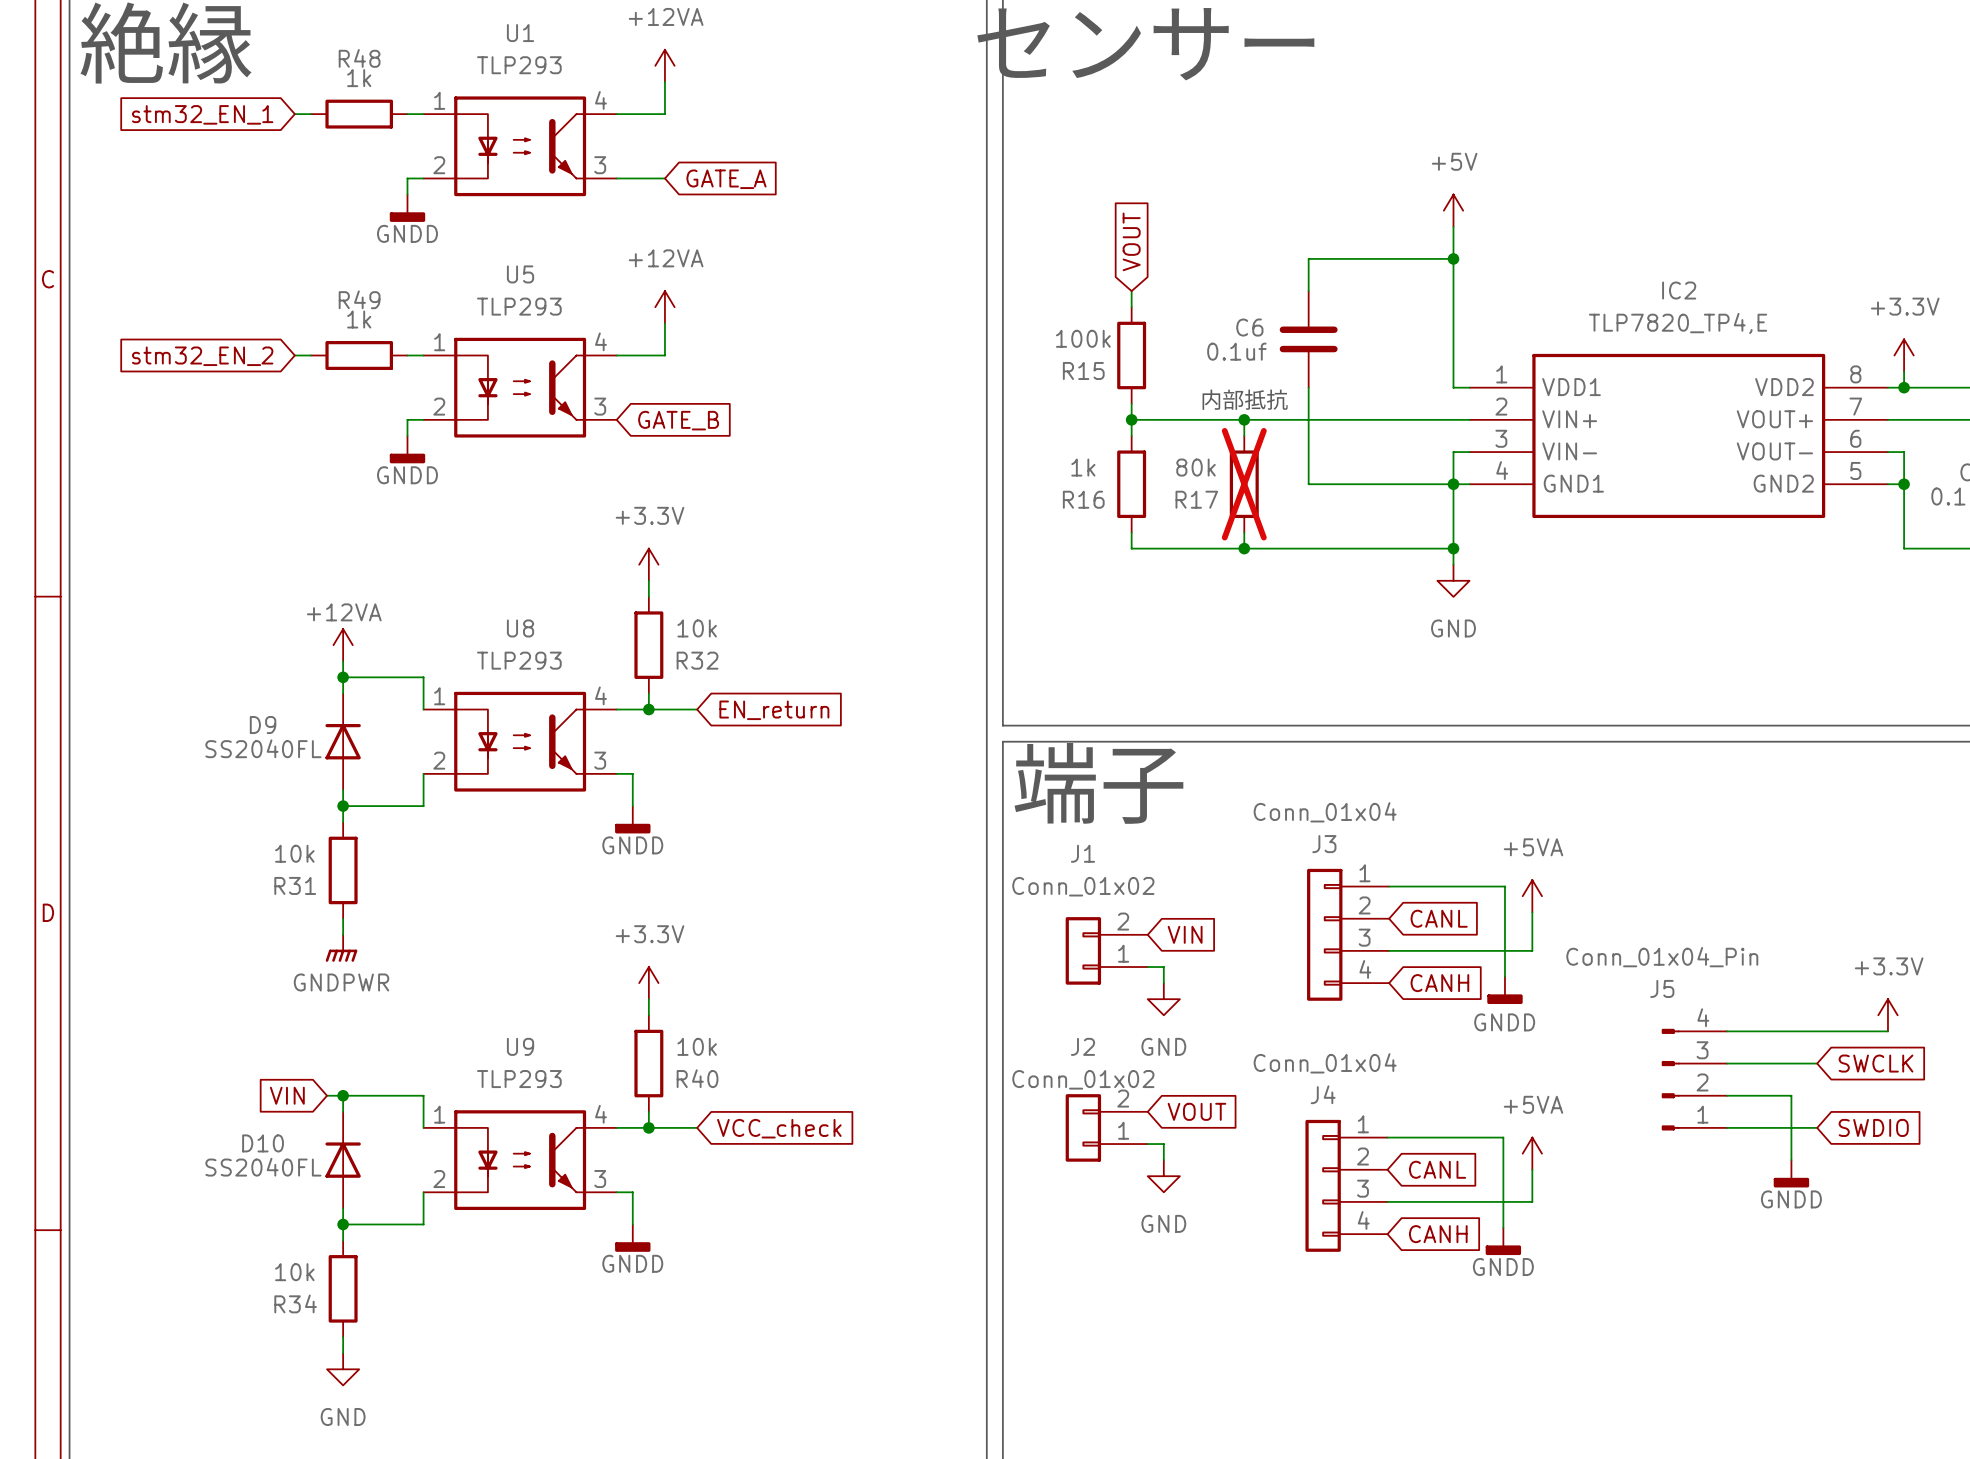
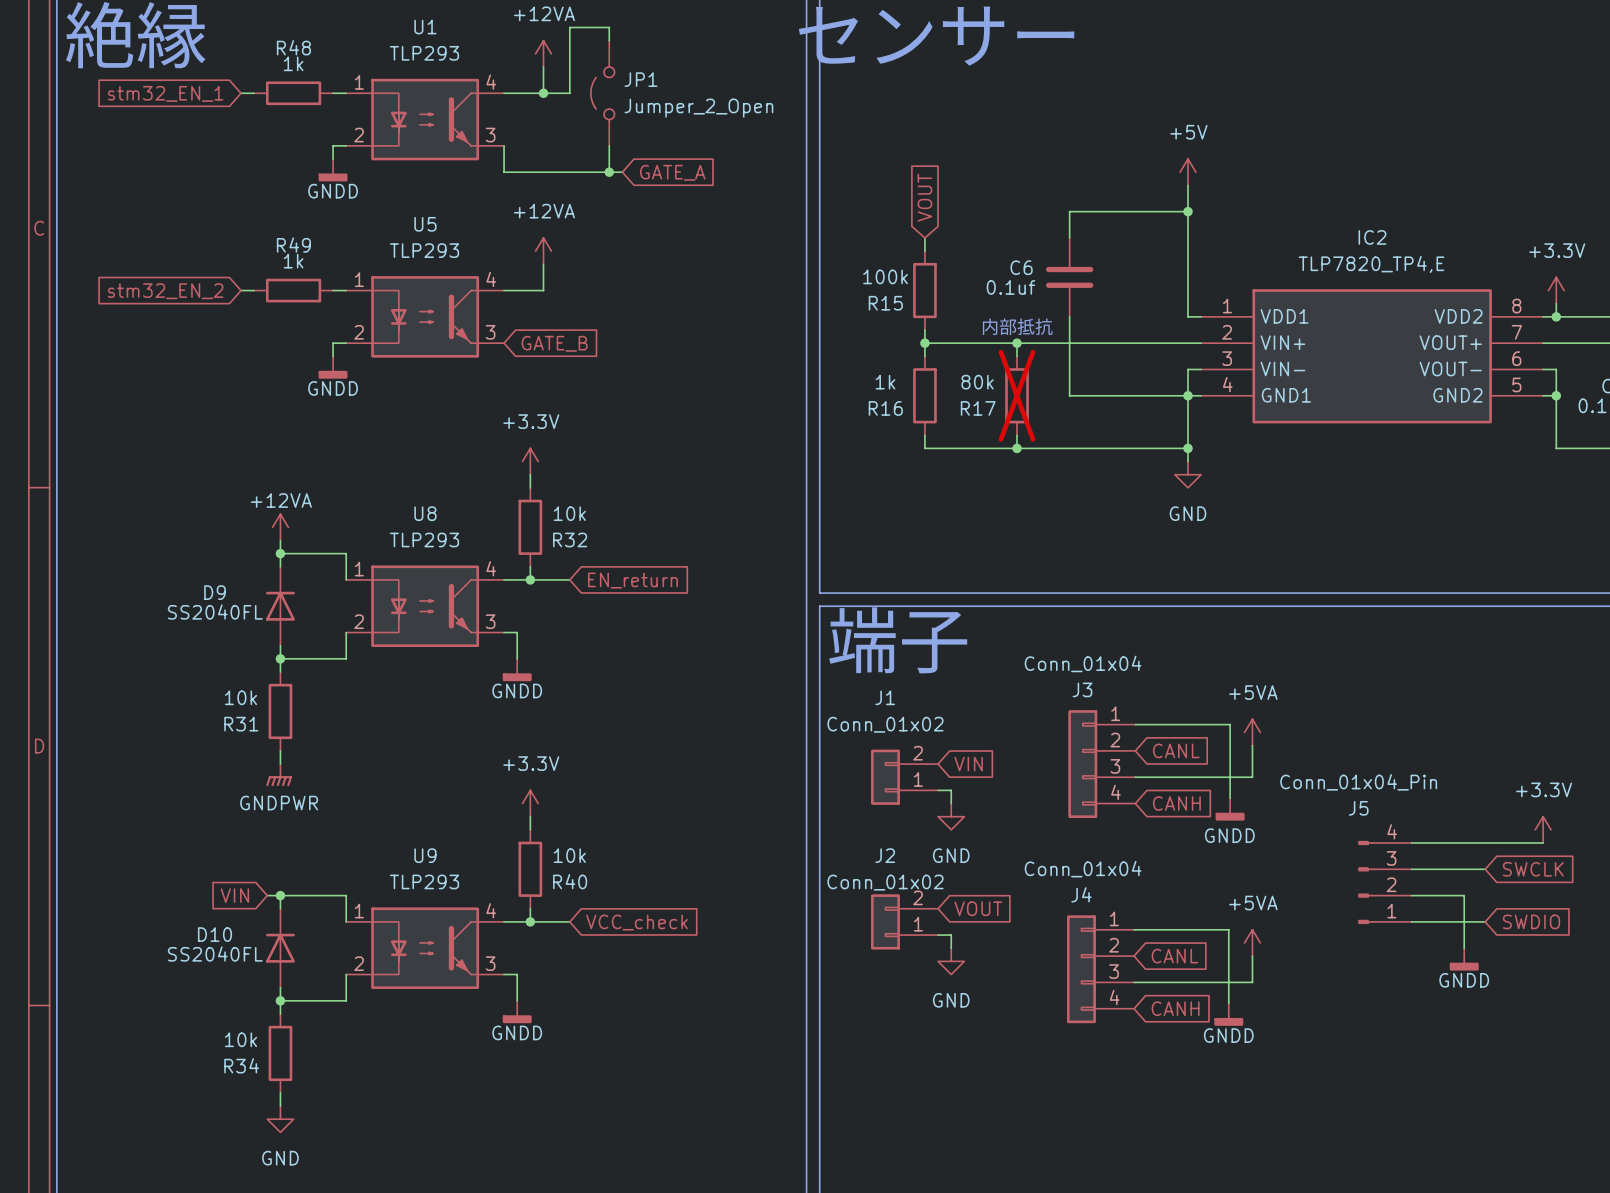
wire: none -> (609, 40) (609, 27) (569, 27) (569, 93) (543, 93)
junction: none -> (543, 93)
JP1: none -> Jumper_2_Open (602, 93)
wire: (616, 178) (664, 178) -> (504, 145) (504, 172) (622, 172)
wire: none -> (609, 145) (609, 172)
global label position: GATE_A (726, 179) -> GATE_A (672, 172)
junction: none -> (609, 172)

